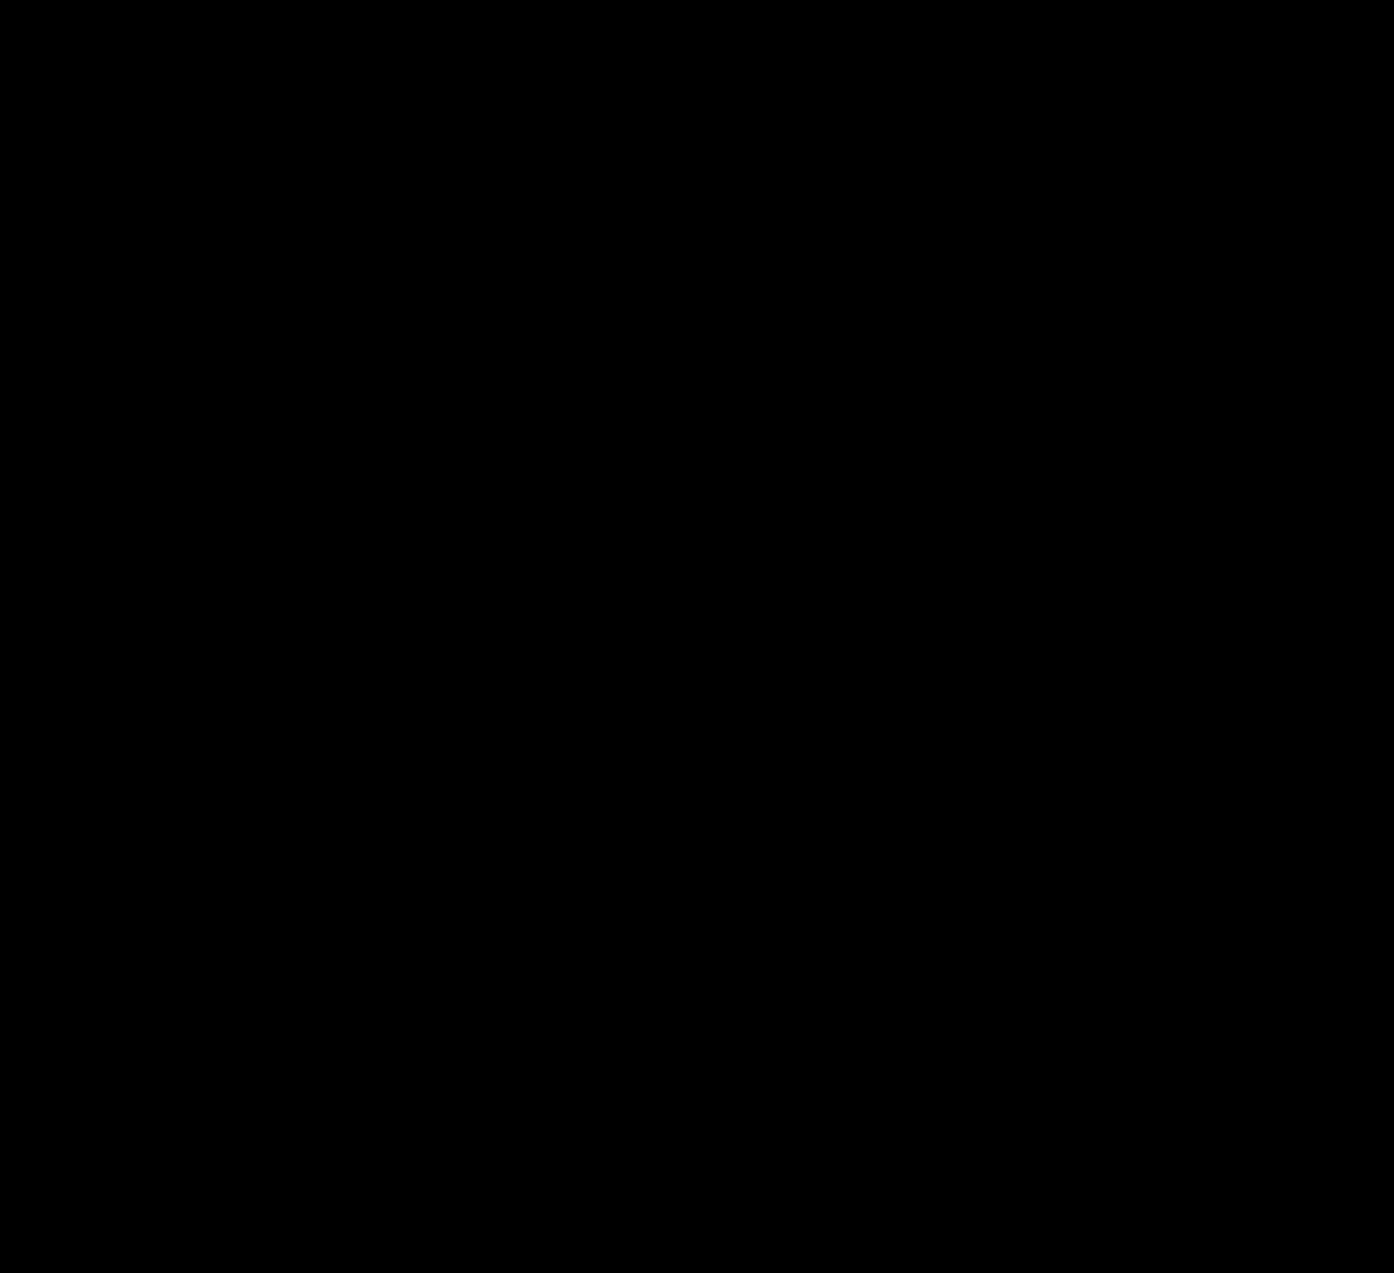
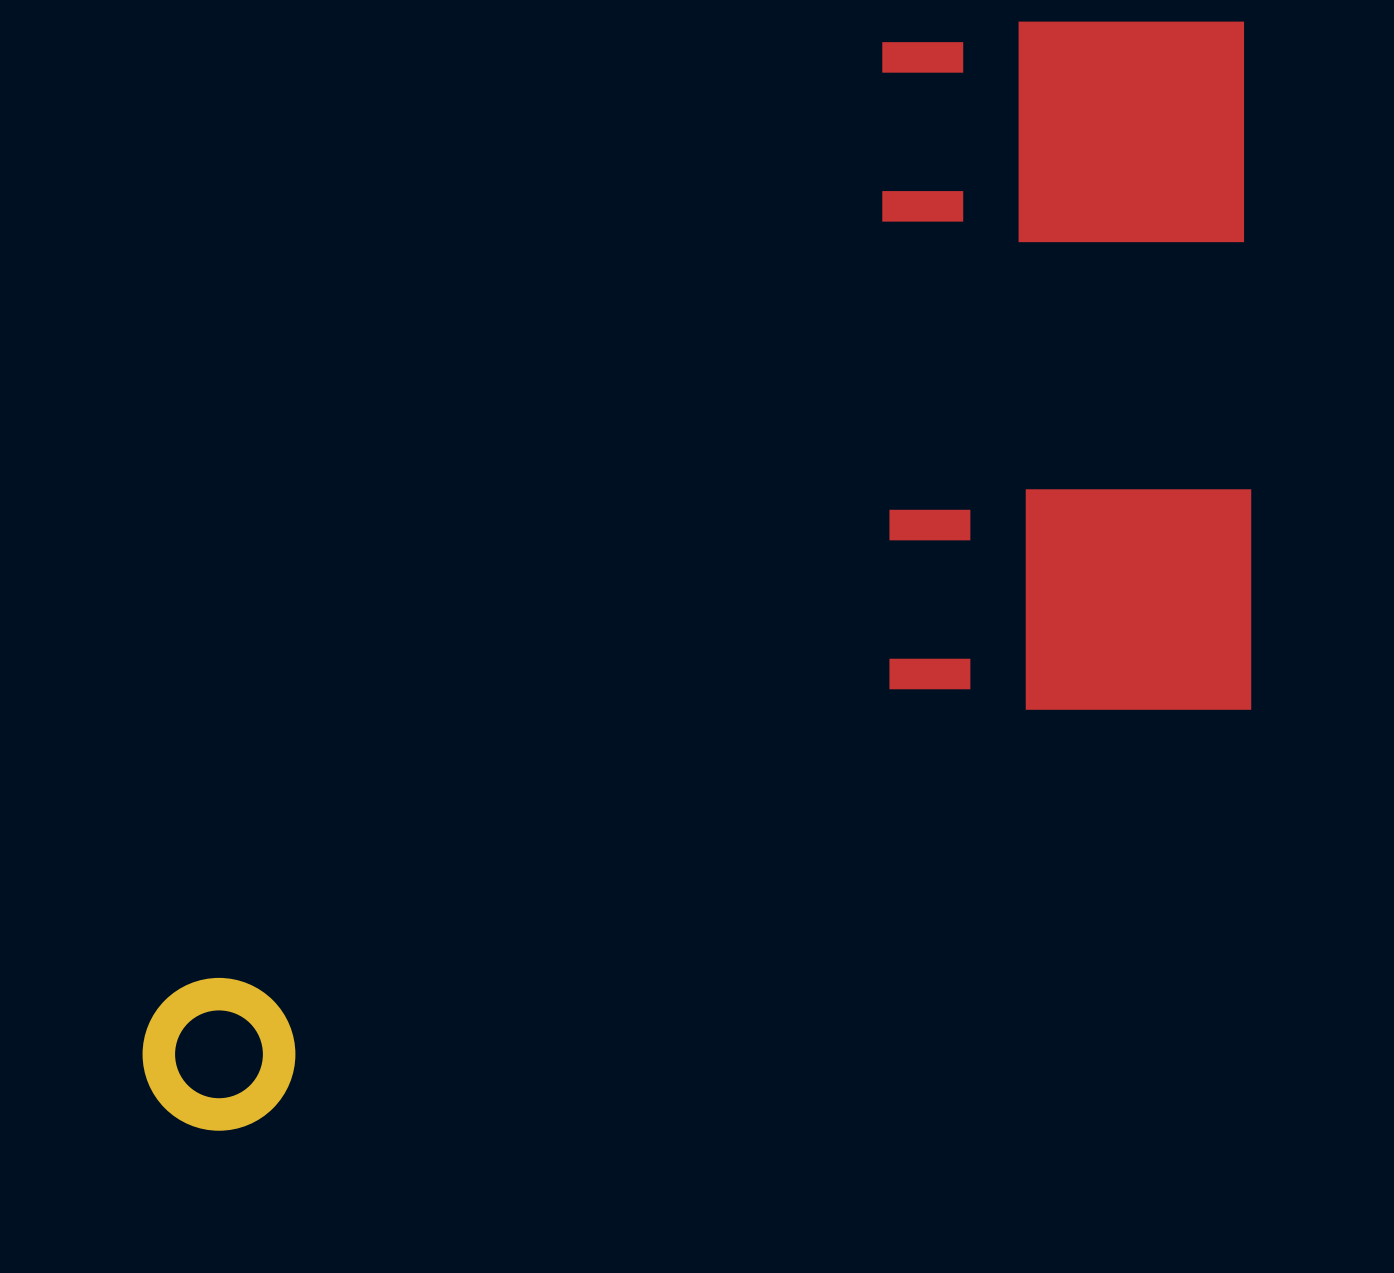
part: none -> (1063, 131)
part: none -> (1070, 599)
part: none -> (218, 1054)

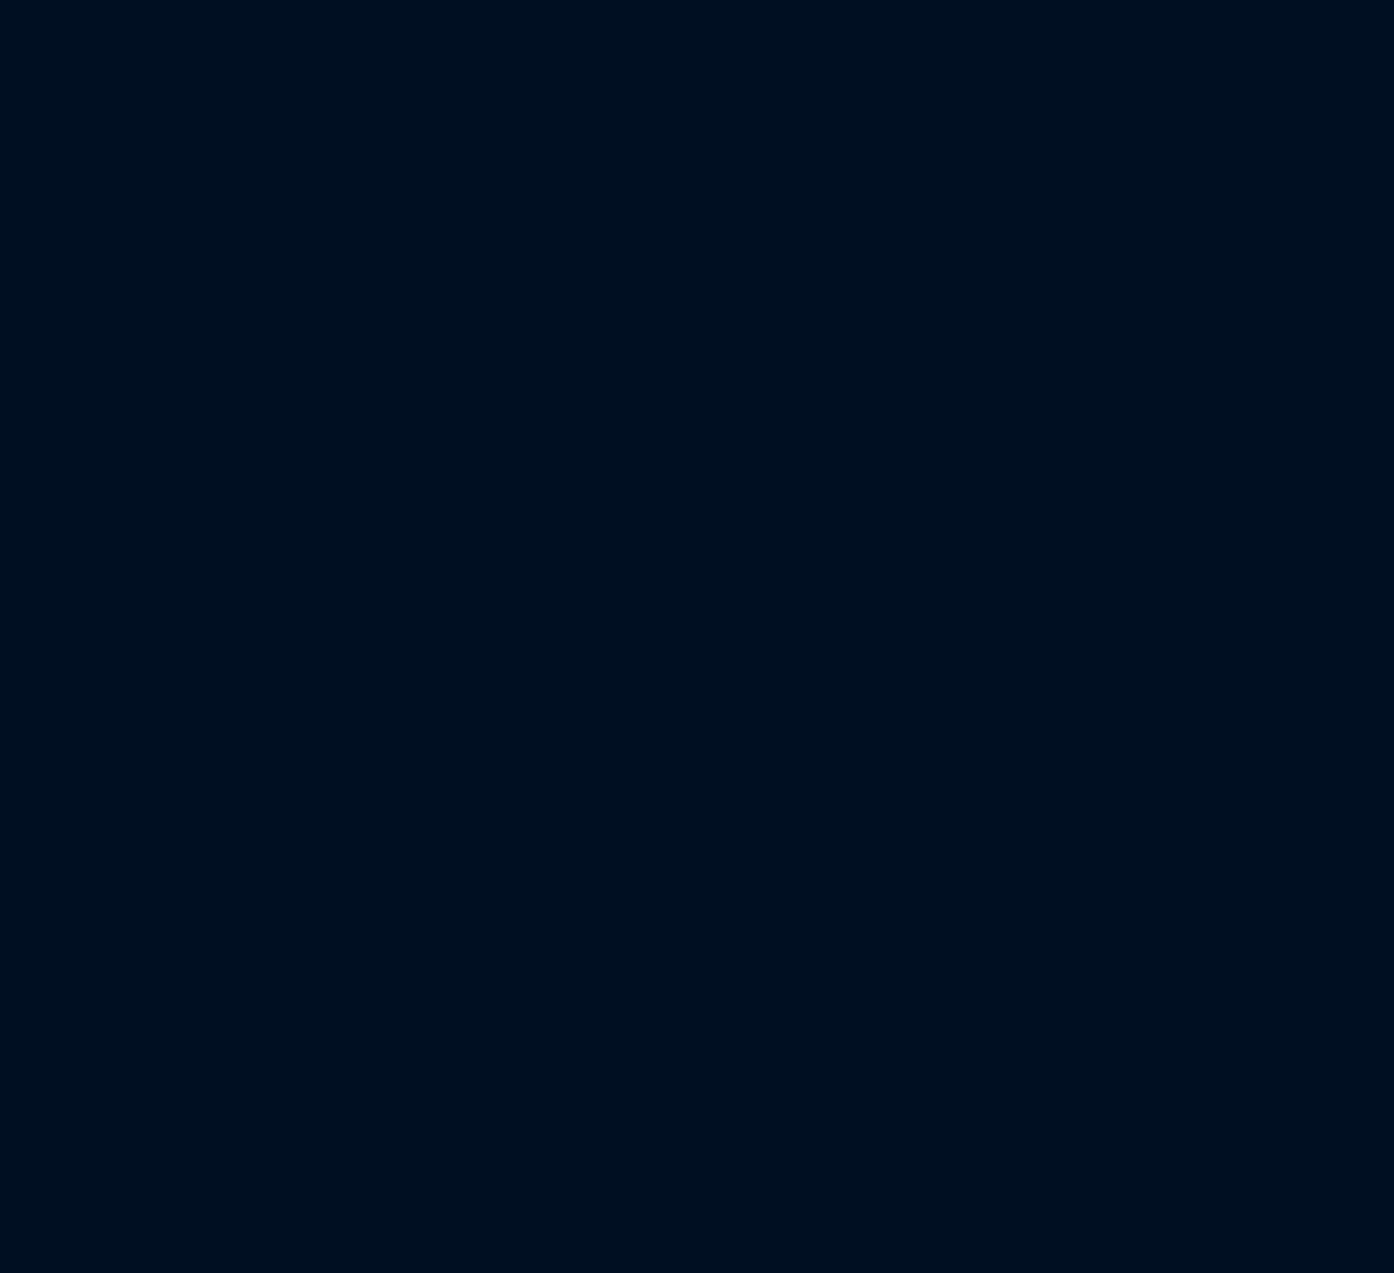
part: (1063, 131) -> none
part: (1070, 599) -> none
part: (218, 1054) -> none

